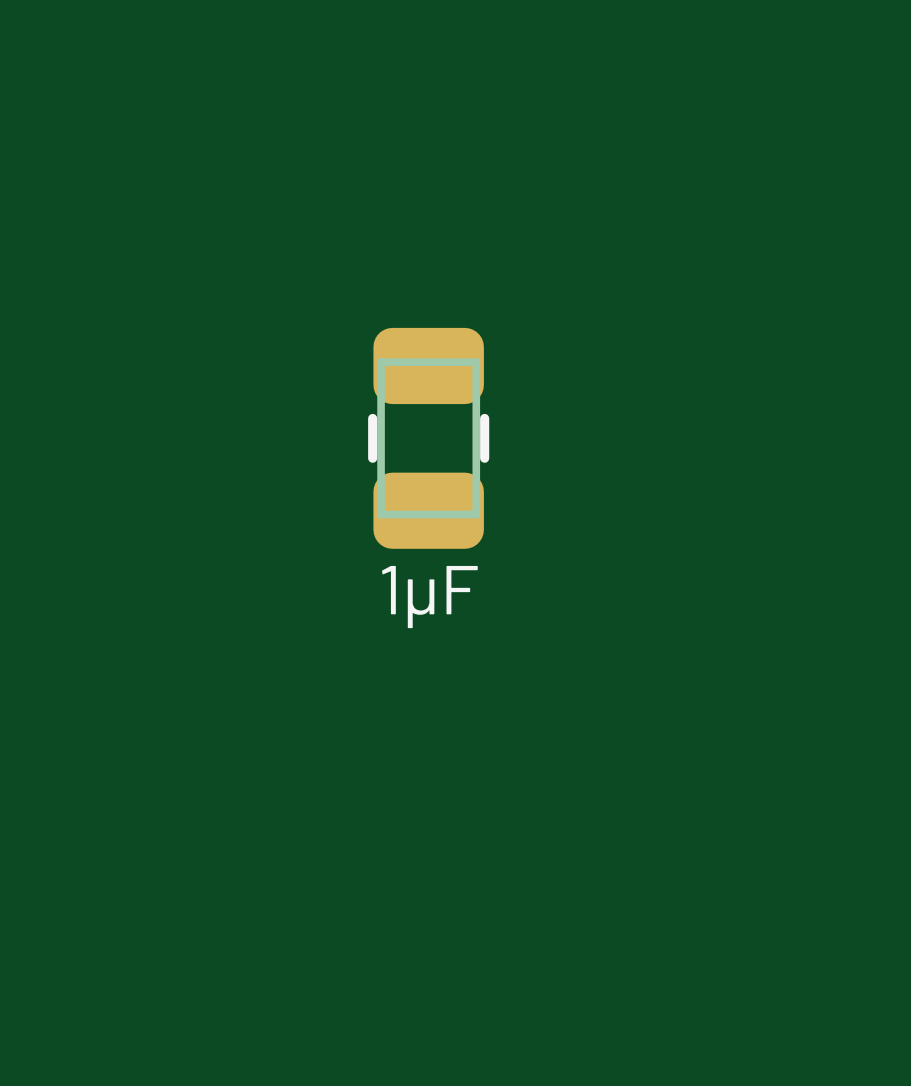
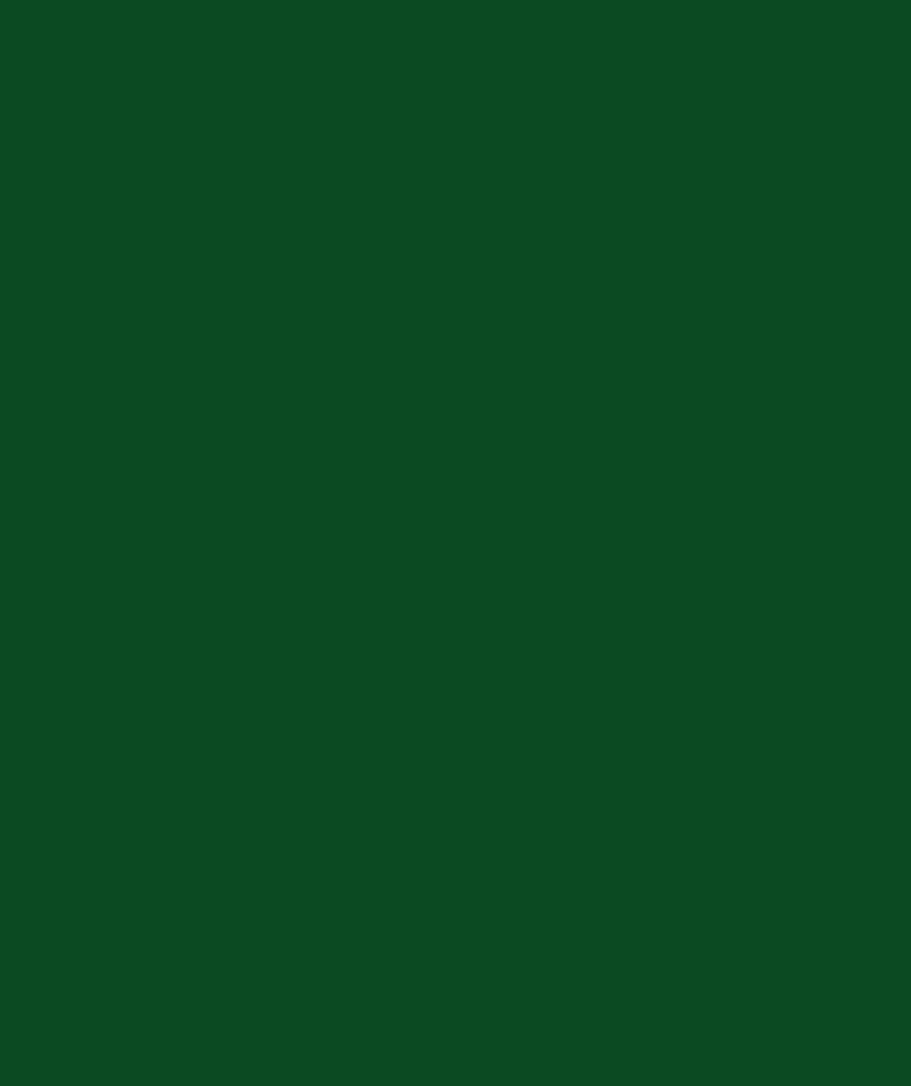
part: 1μF (428, 438) -> none

